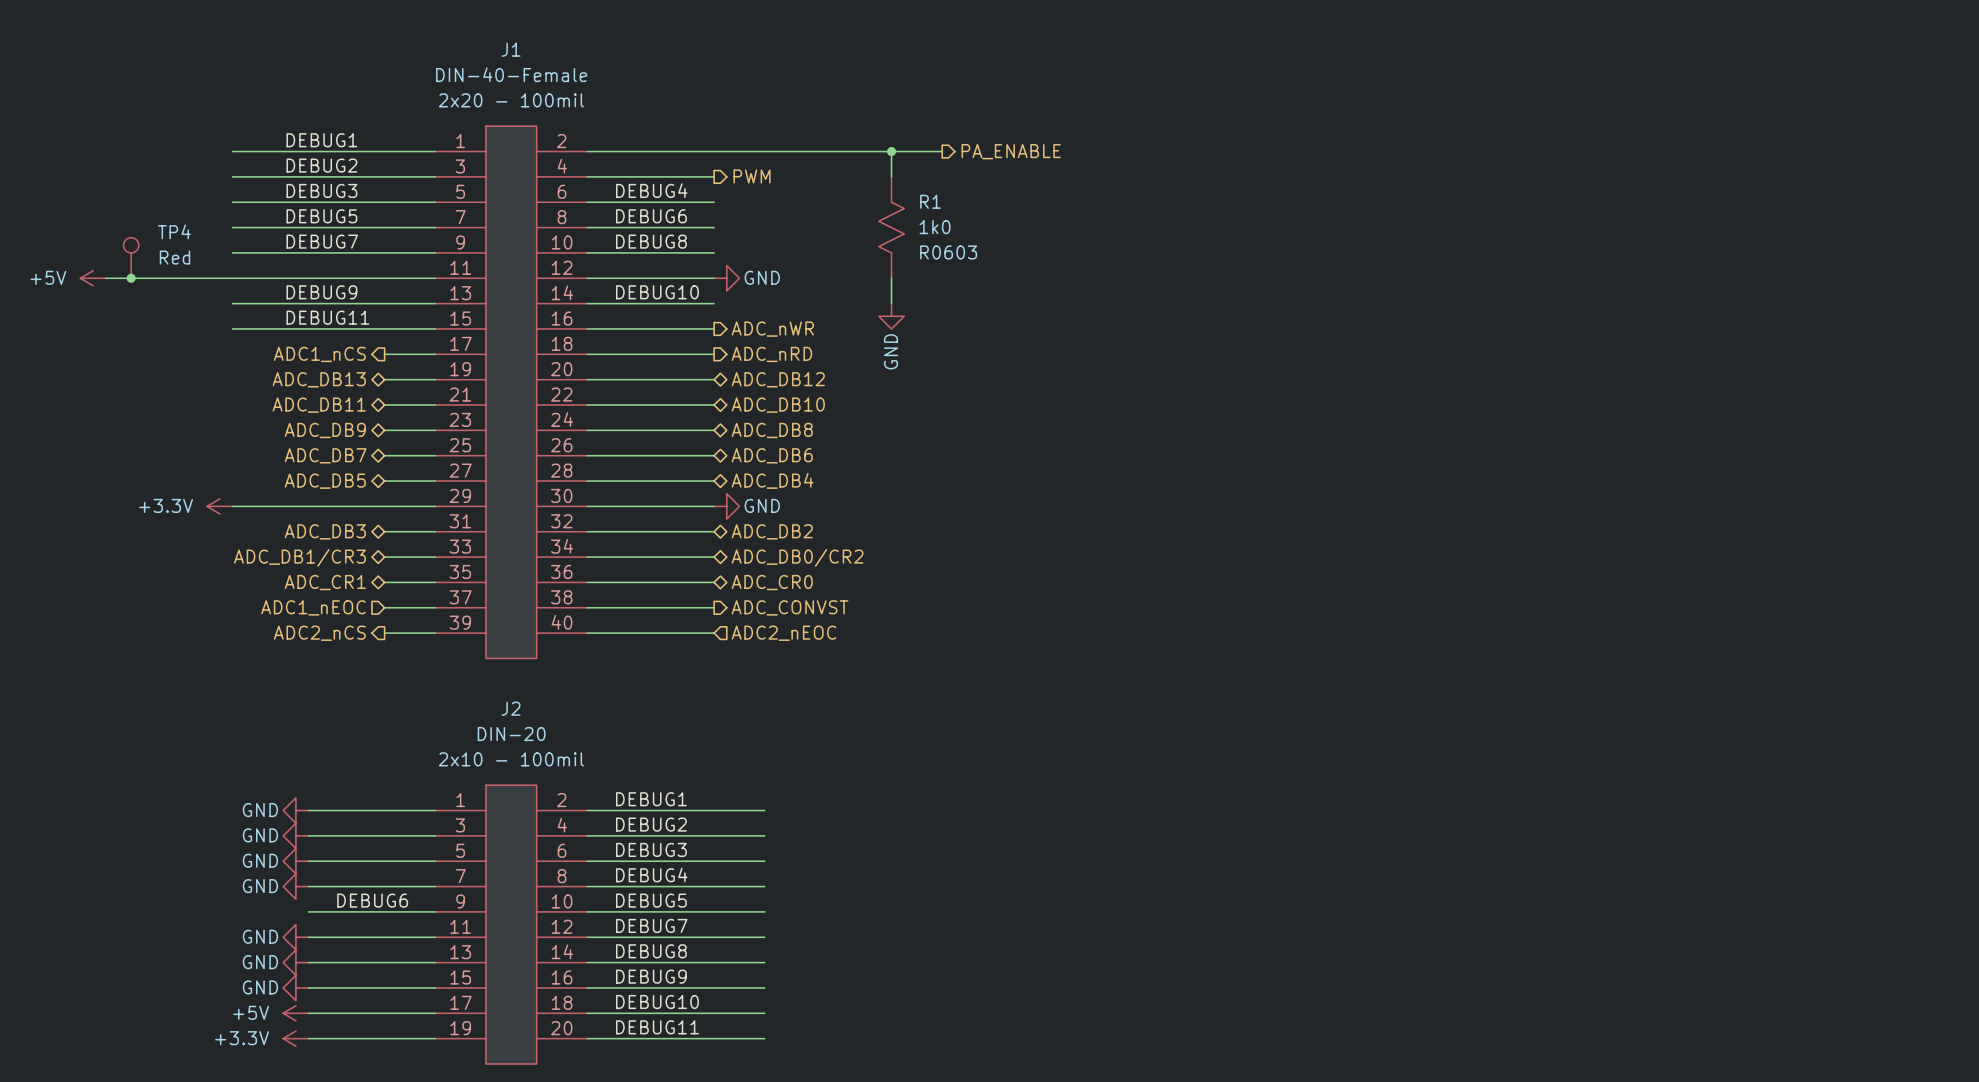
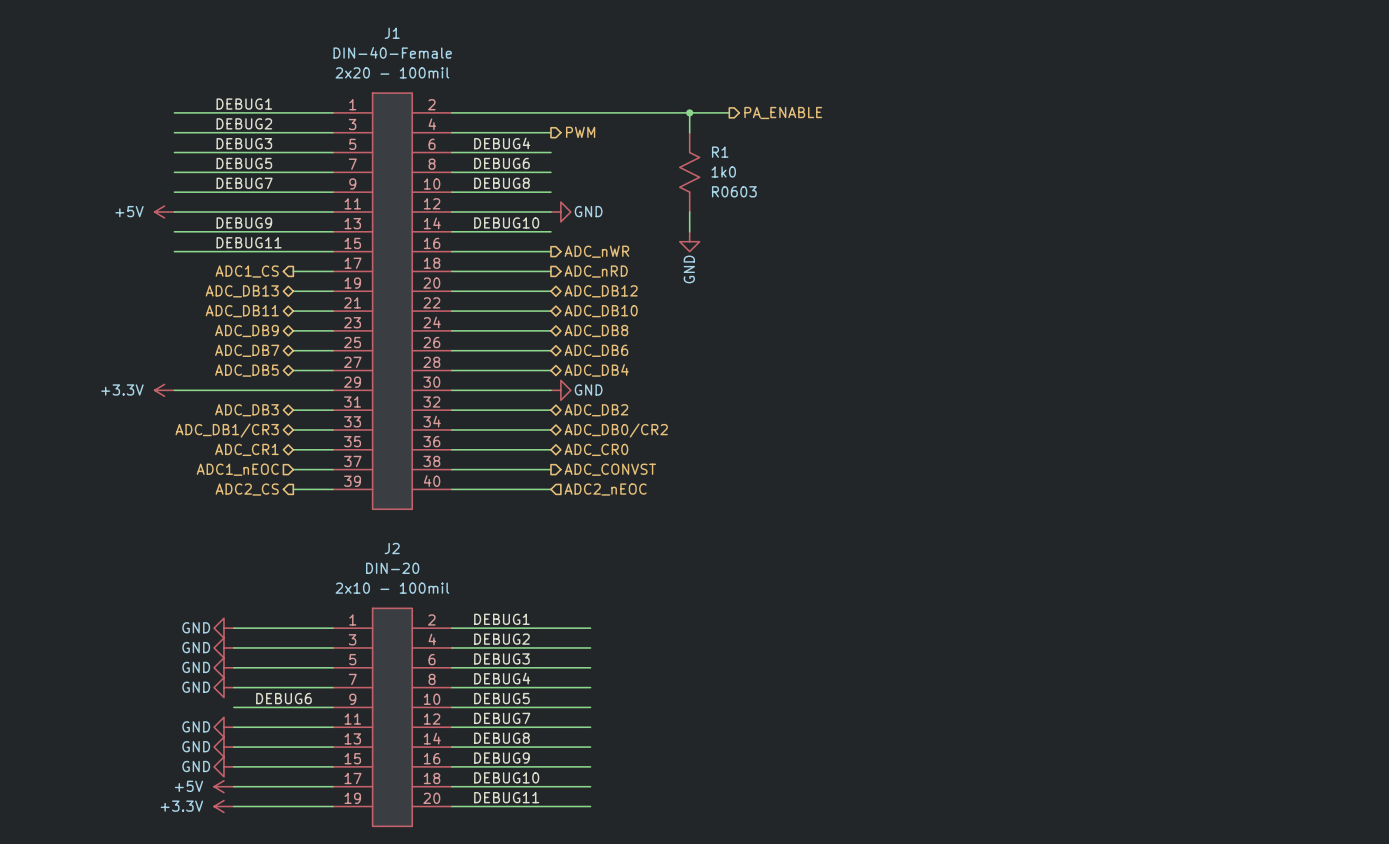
TP4: (131, 258) -> none
power symbol position: +5V (93, 278) -> +5V (164, 211)
wire: (105, 278) (232, 278) -> none
junction: (131, 278) -> none
hierarchical label: ADC1_nCS (319, 354) -> ADC1_CS (247, 271)
hierarchical label: ADC2_nCS (319, 633) -> ADC2_CS (247, 489)

